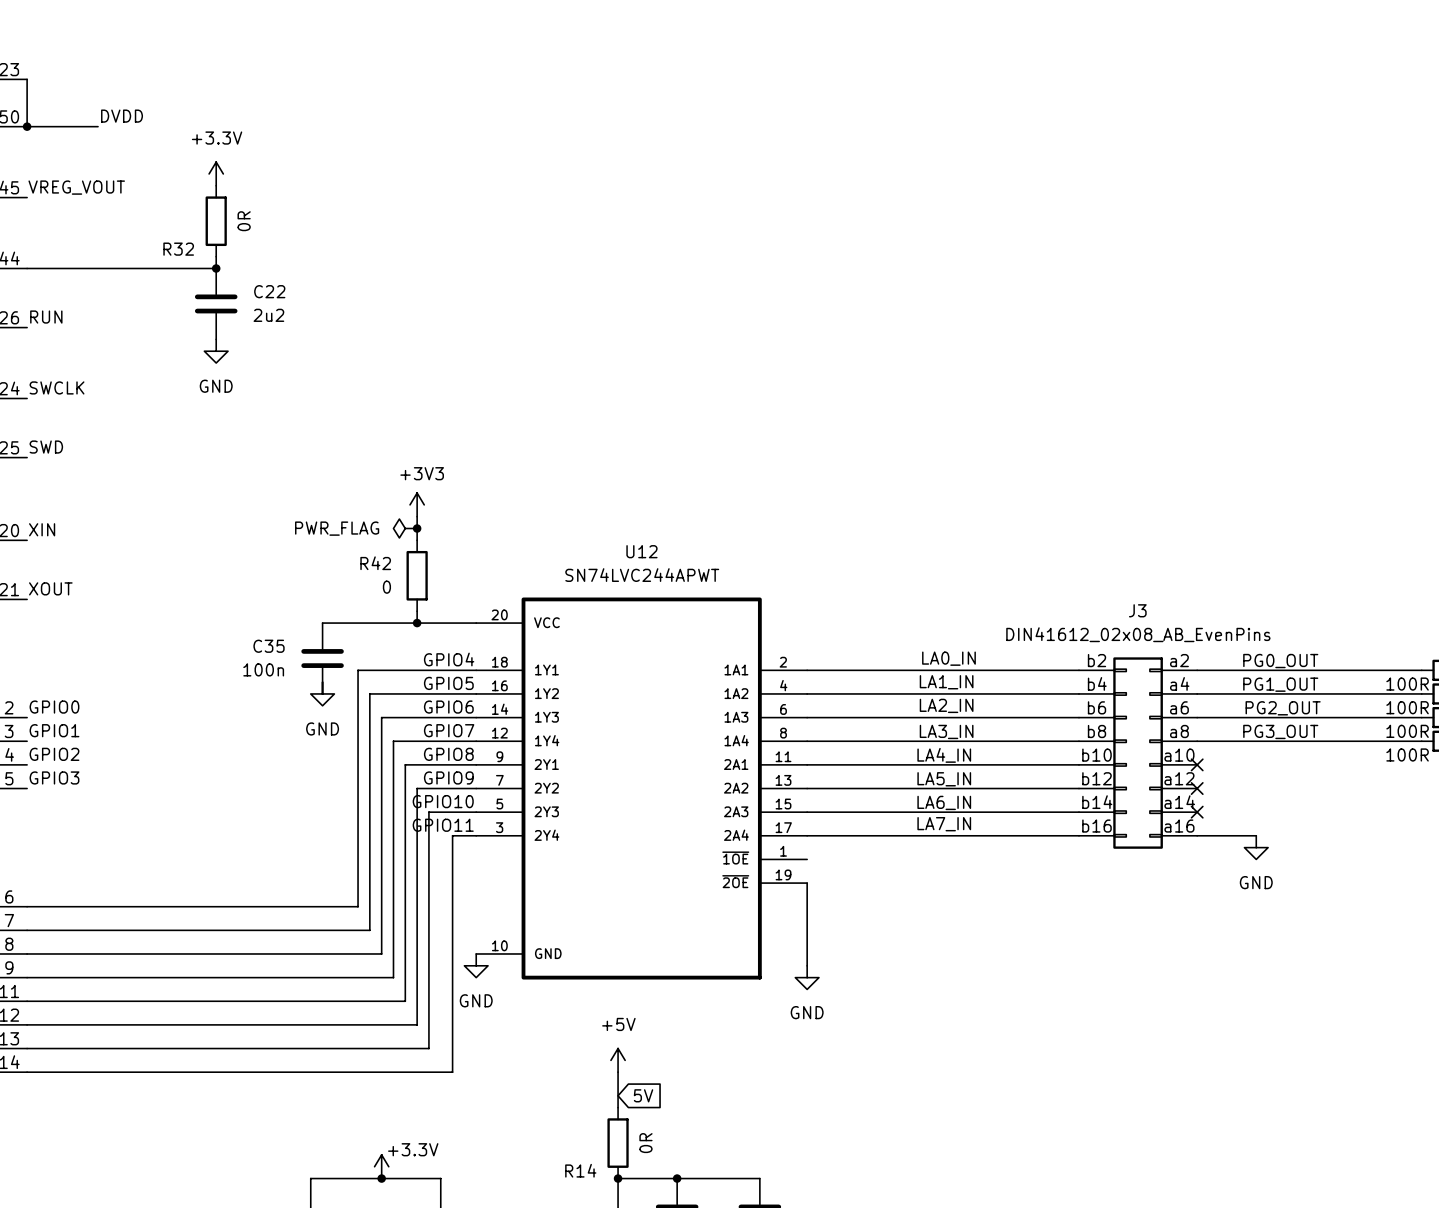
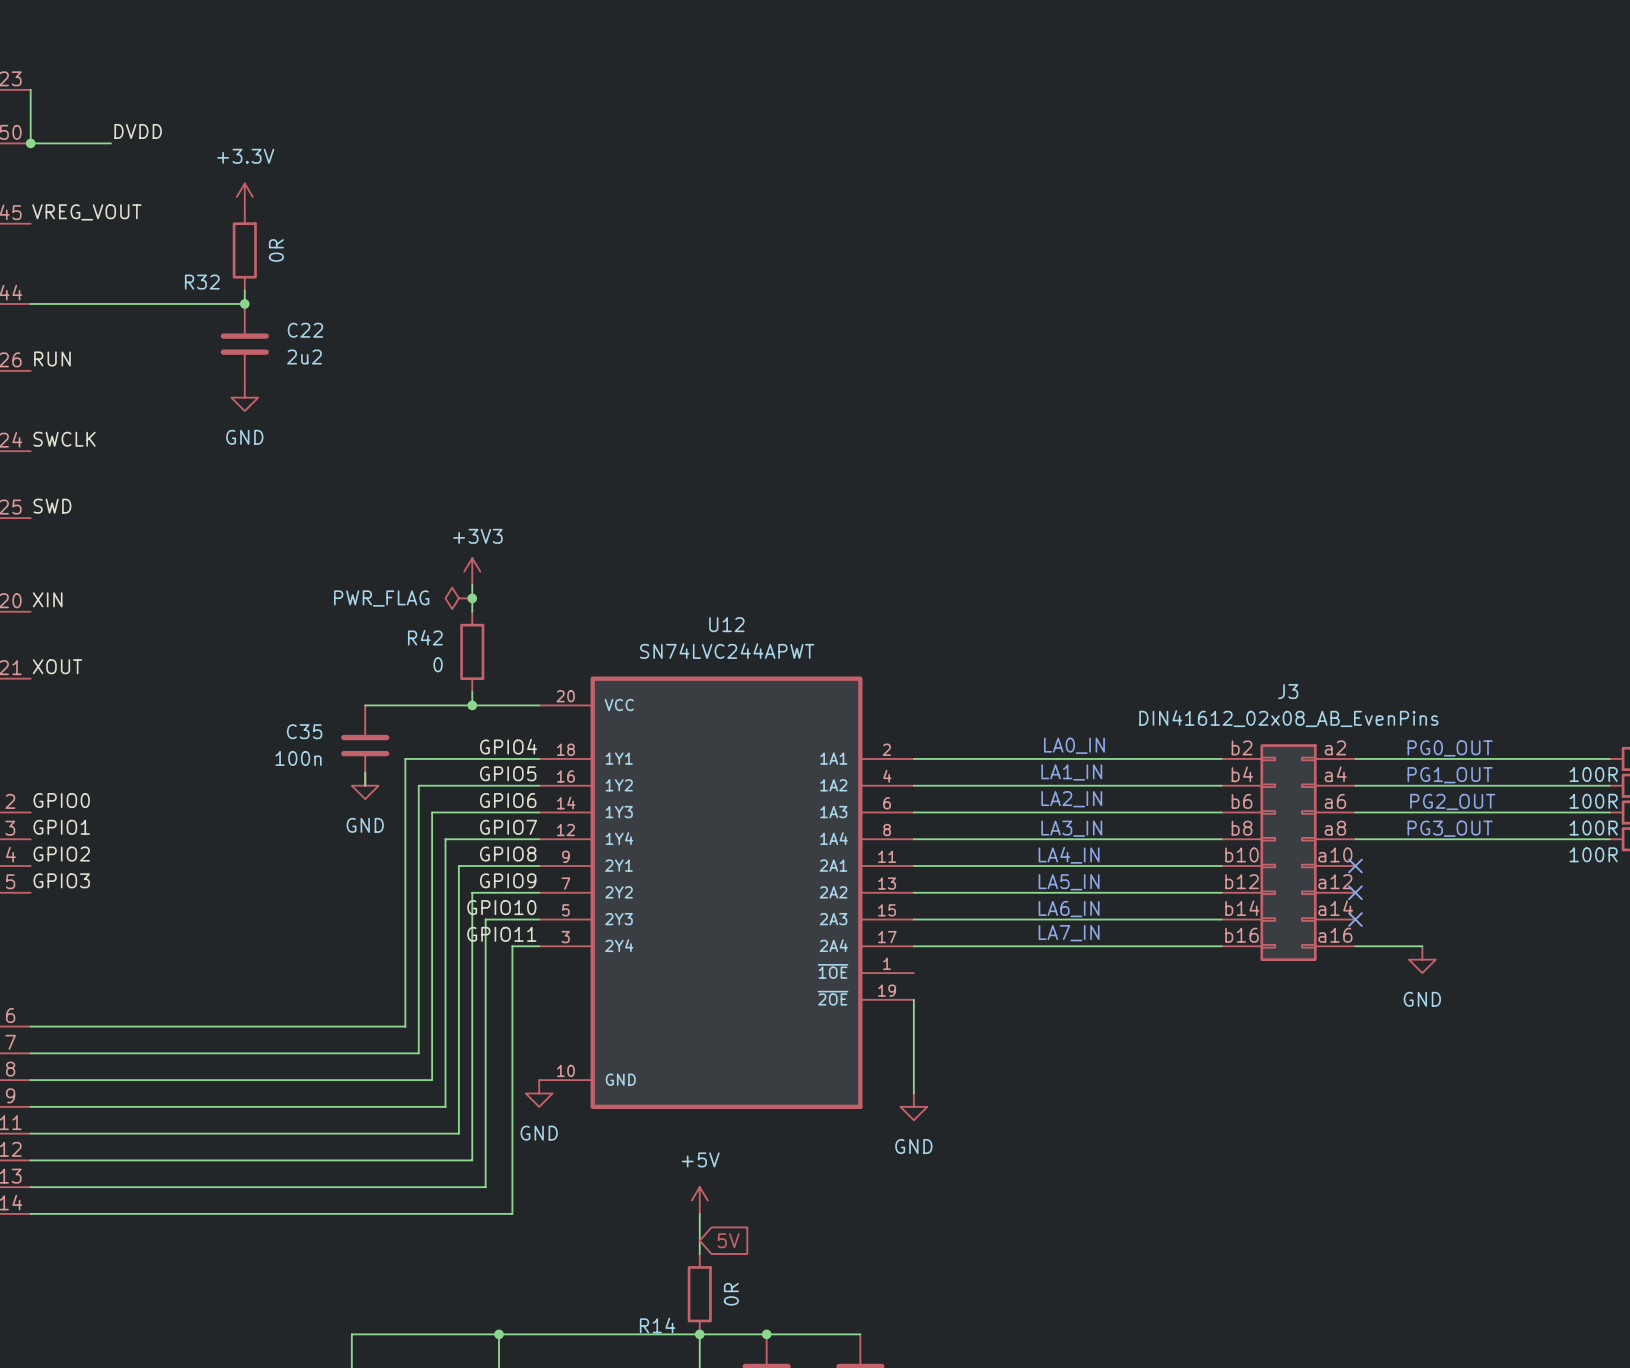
power symbol: +3.3V (381, 1166) -> none
junction: (381, 1178) -> none
wire: none -> (499, 1334) (699, 1334)
junction: none -> (499, 1334)

